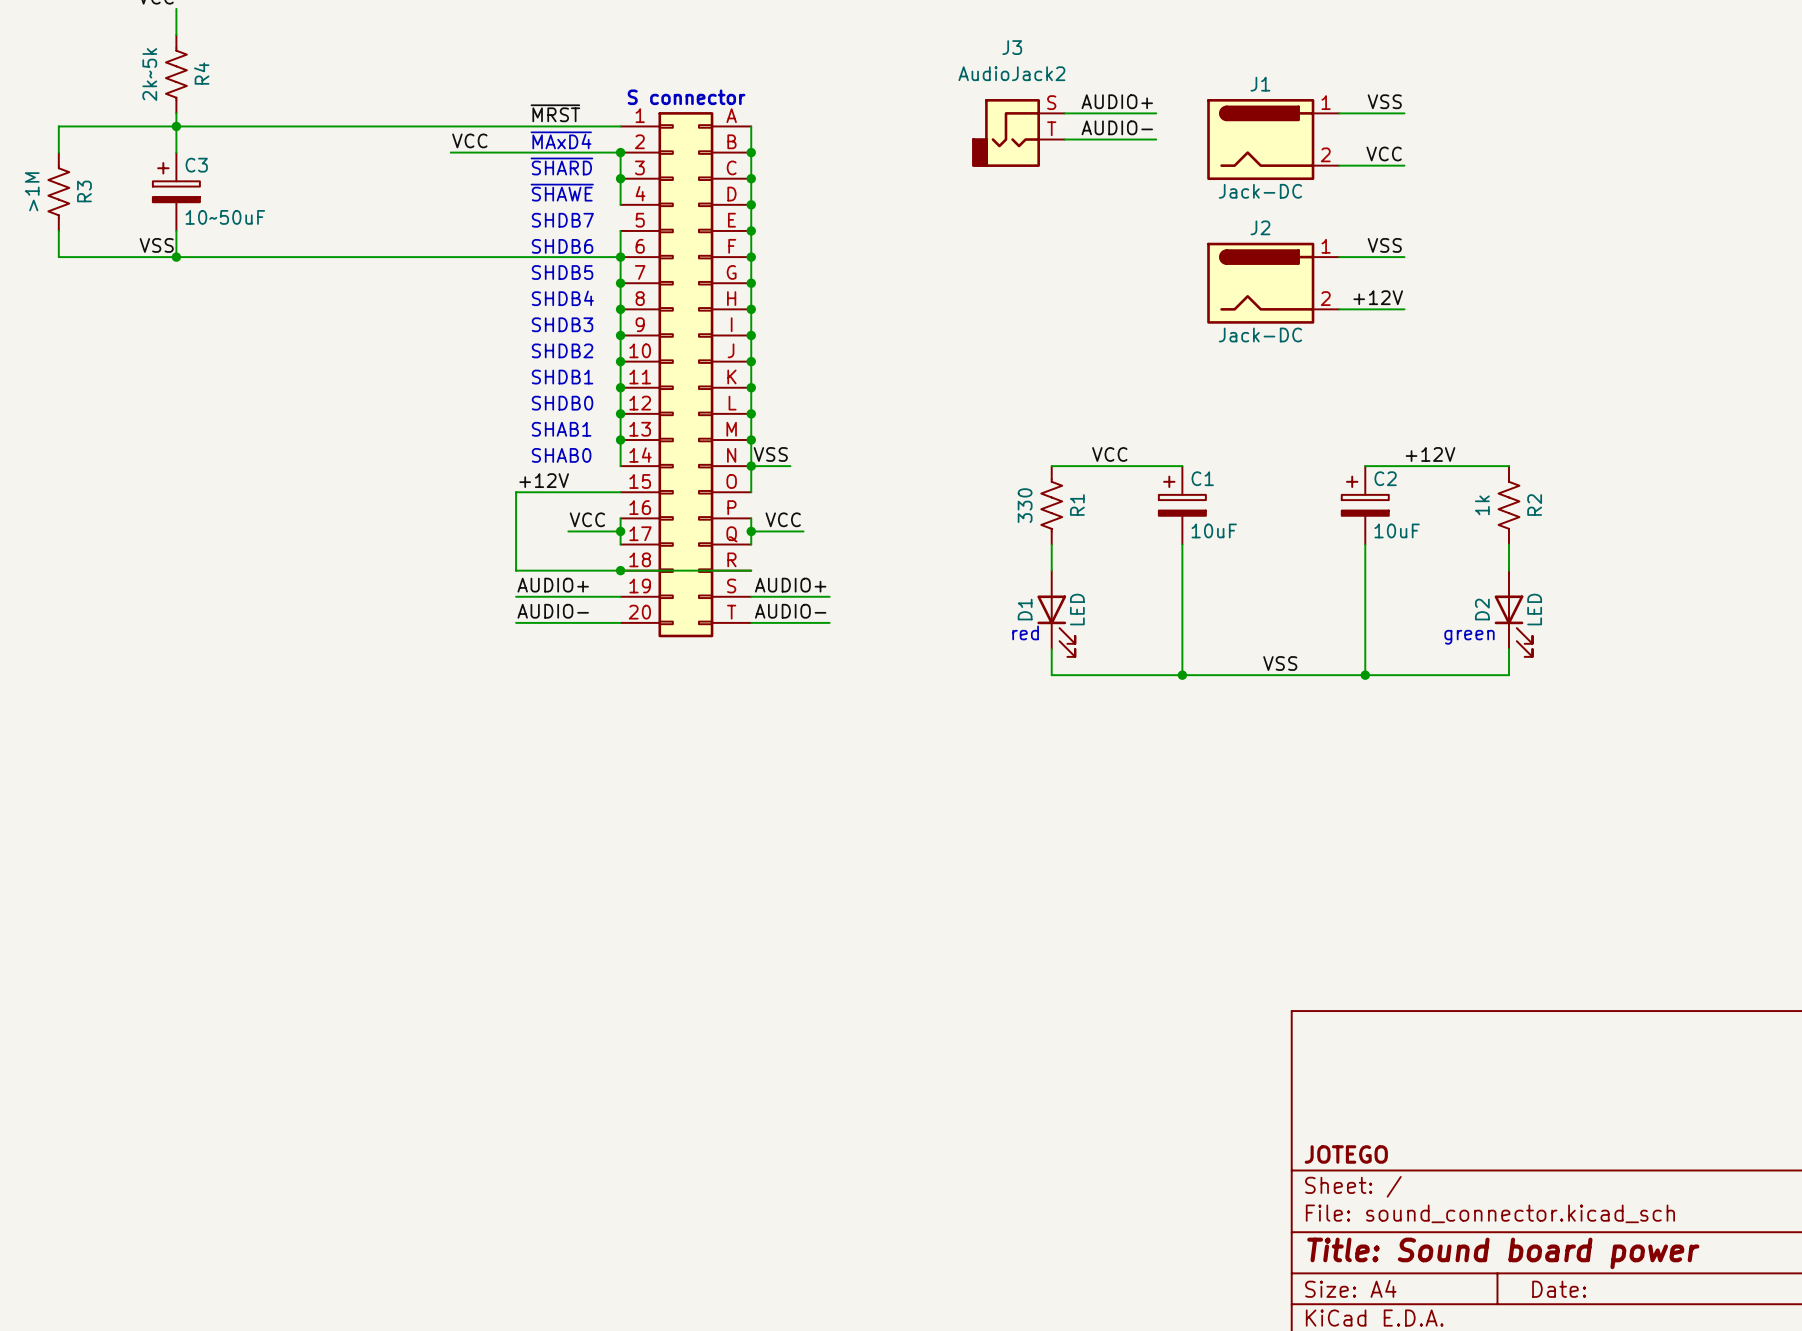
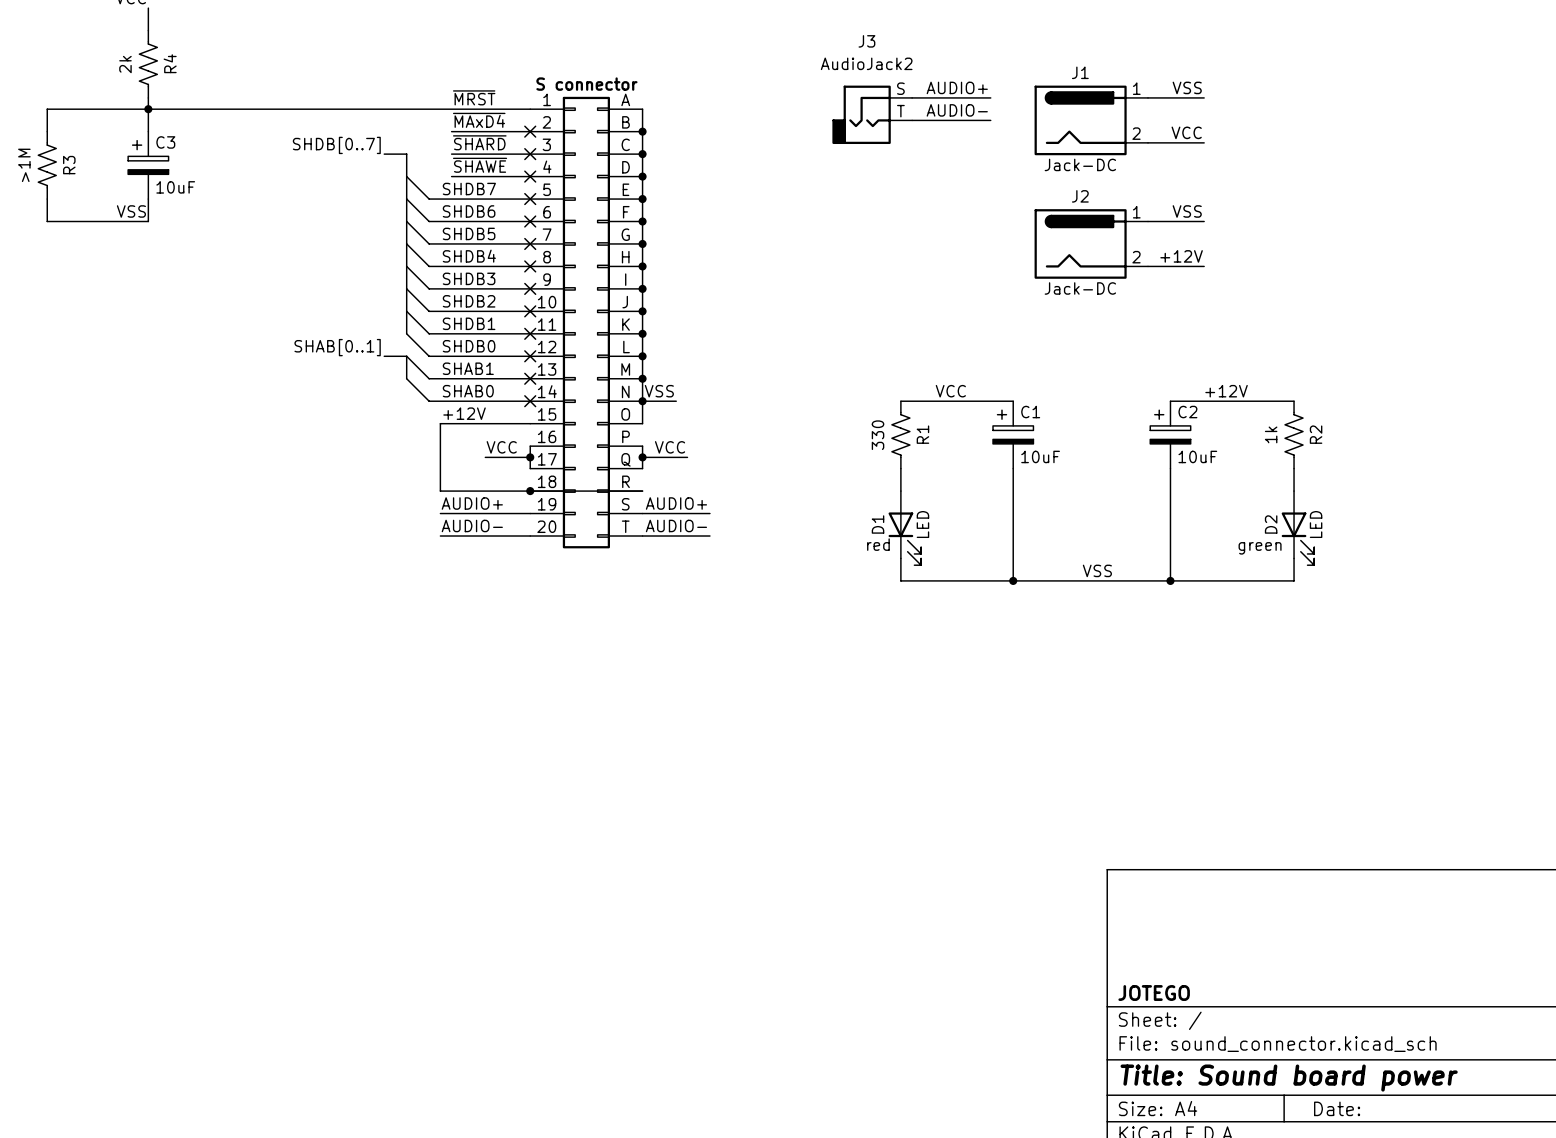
R4 value: 2k~5k (149, 74) -> 2k (125, 64)
label: none -> ~{MAxD4} (479, 120)
label: VCC (469, 140) -> none
text: ~{MAxD4} (561, 140) -> none
wire: (450, 152) (529, 152) -> none
wire: (620, 152) (620, 204) -> (451, 176) (530, 176)
junction: (620, 152) -> none
no-connect mark: none -> (530, 131)
label: none -> ~{SHARD} (479, 142)
text: ~{SHARD} (561, 166) -> none
label: none -> SHDB[0..7] (336, 145)
bus: none -> (384, 154) (406, 154) (406, 333)
wire: none -> (451, 154) (530, 154)
junction: (620, 178) -> none
no-connect mark: none -> (530, 154)
label: none -> ~{SHAWE} (480, 165)
text: ~{SHAWE} (562, 192) -> none
wire: none -> (406, 176) (429, 199) (530, 199)
no-connect mark: none -> (530, 176)
C3 value: 10~50uF (225, 217) -> 10uF (175, 187)
label: none -> SHDB7 (469, 189)
text: SHDB7 (562, 220) -> none
wire: (620, 230) (620, 466) -> (406, 378) (429, 401) (530, 401)
no-connect mark: none -> (530, 199)
label: none -> SHDB6 (469, 211)
text: SHDB6 (562, 246) -> none
wire: (176, 257) (503, 257) -> (406, 199) (429, 221)
junction: (176, 257) -> none
wire: none -> (406, 221) (429, 243) (530, 243)
junction: (620, 257) -> none
no-connect mark: none -> (530, 221)
label: none -> SHDB5 (469, 233)
text: SHDB5 (562, 272) -> none
wire: none -> (406, 243) (429, 266) (530, 266)
junction: (620, 283) -> none
no-connect mark: none -> (530, 243)
label: none -> SHDB4 (469, 256)
text: SHDB4 (562, 298) -> none
wire: none -> (406, 266) (429, 288) (530, 288)
junction: (620, 309) -> none
no-connect mark: none -> (530, 266)
label: none -> SHDB3 (469, 278)
text: SHDB3 (562, 324) -> none
wire: none -> (406, 288) (429, 311) (530, 311)
junction: (620, 335) -> none
no-connect mark: none -> (530, 288)
label: none -> SHDB2 (469, 301)
text: SHDB2 (562, 350) -> none
wire: none -> (406, 311) (429, 333) (530, 333)
junction: (620, 361) -> none
no-connect mark: none -> (530, 311)
label: none -> SHDB1 (469, 323)
text: SHDB1 (562, 377) -> none
wire: none -> (406, 333) (429, 356) (530, 356)
junction: (620, 387) -> none
no-connect mark: none -> (530, 333)
label: none -> SHDB0 (469, 346)
label: none -> SHAB[0..1] (337, 347)
text: SHDB0 (562, 403) -> none
bus: none -> (384, 356) (406, 356) (406, 378)
wire: none -> (406, 356) (429, 378) (530, 378)
junction: (620, 413) -> none
no-connect mark: none -> (530, 356)
label: none -> SHAB1 (468, 368)
text: SHAB1 (561, 429) -> none
junction: (620, 440) -> none
no-connect mark: none -> (530, 378)
label: none -> SHAB0 (468, 391)
text: SHAB0 (561, 455) -> none
no-connect mark: none -> (530, 401)

